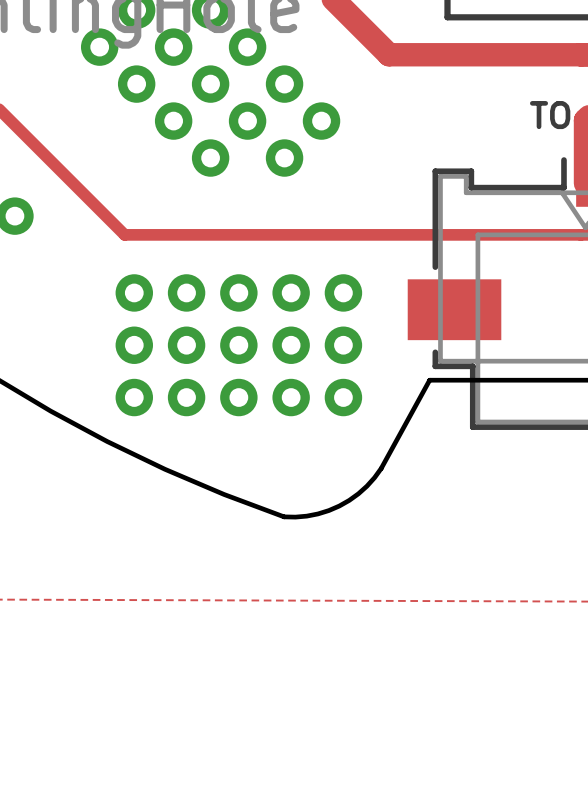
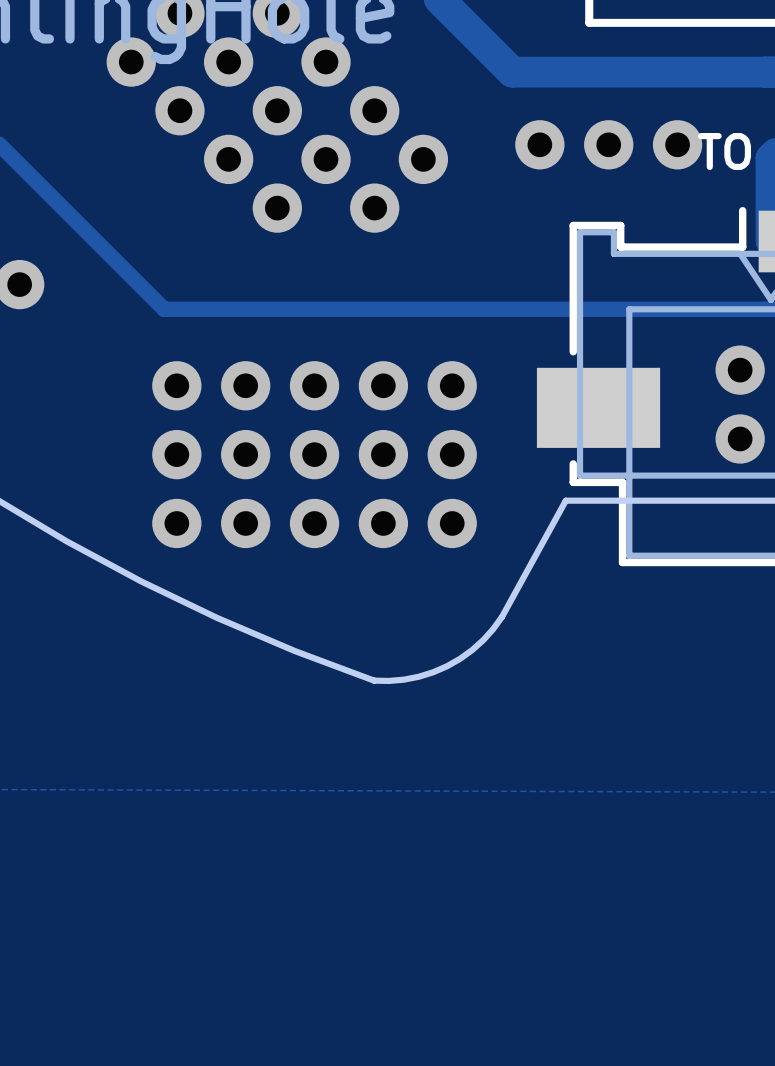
via: none -> (539, 144)
via: none -> (608, 144)
via: none -> (677, 144)
via: none -> (740, 370)
via: none -> (740, 438)

